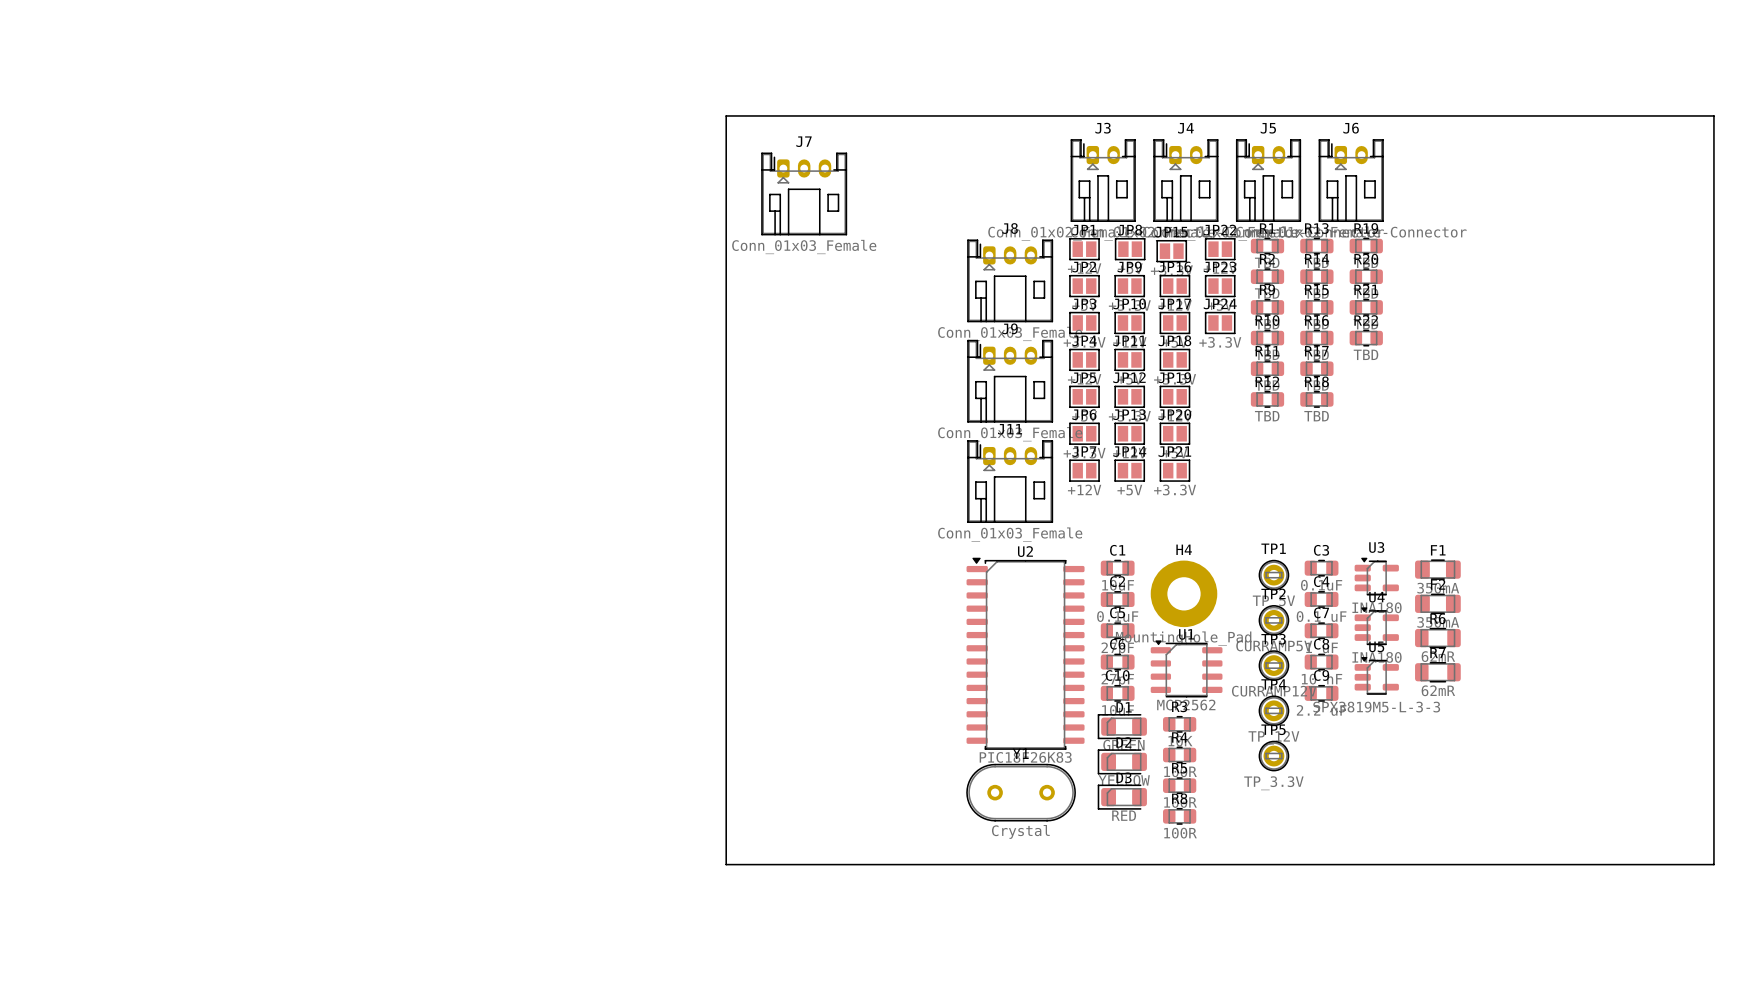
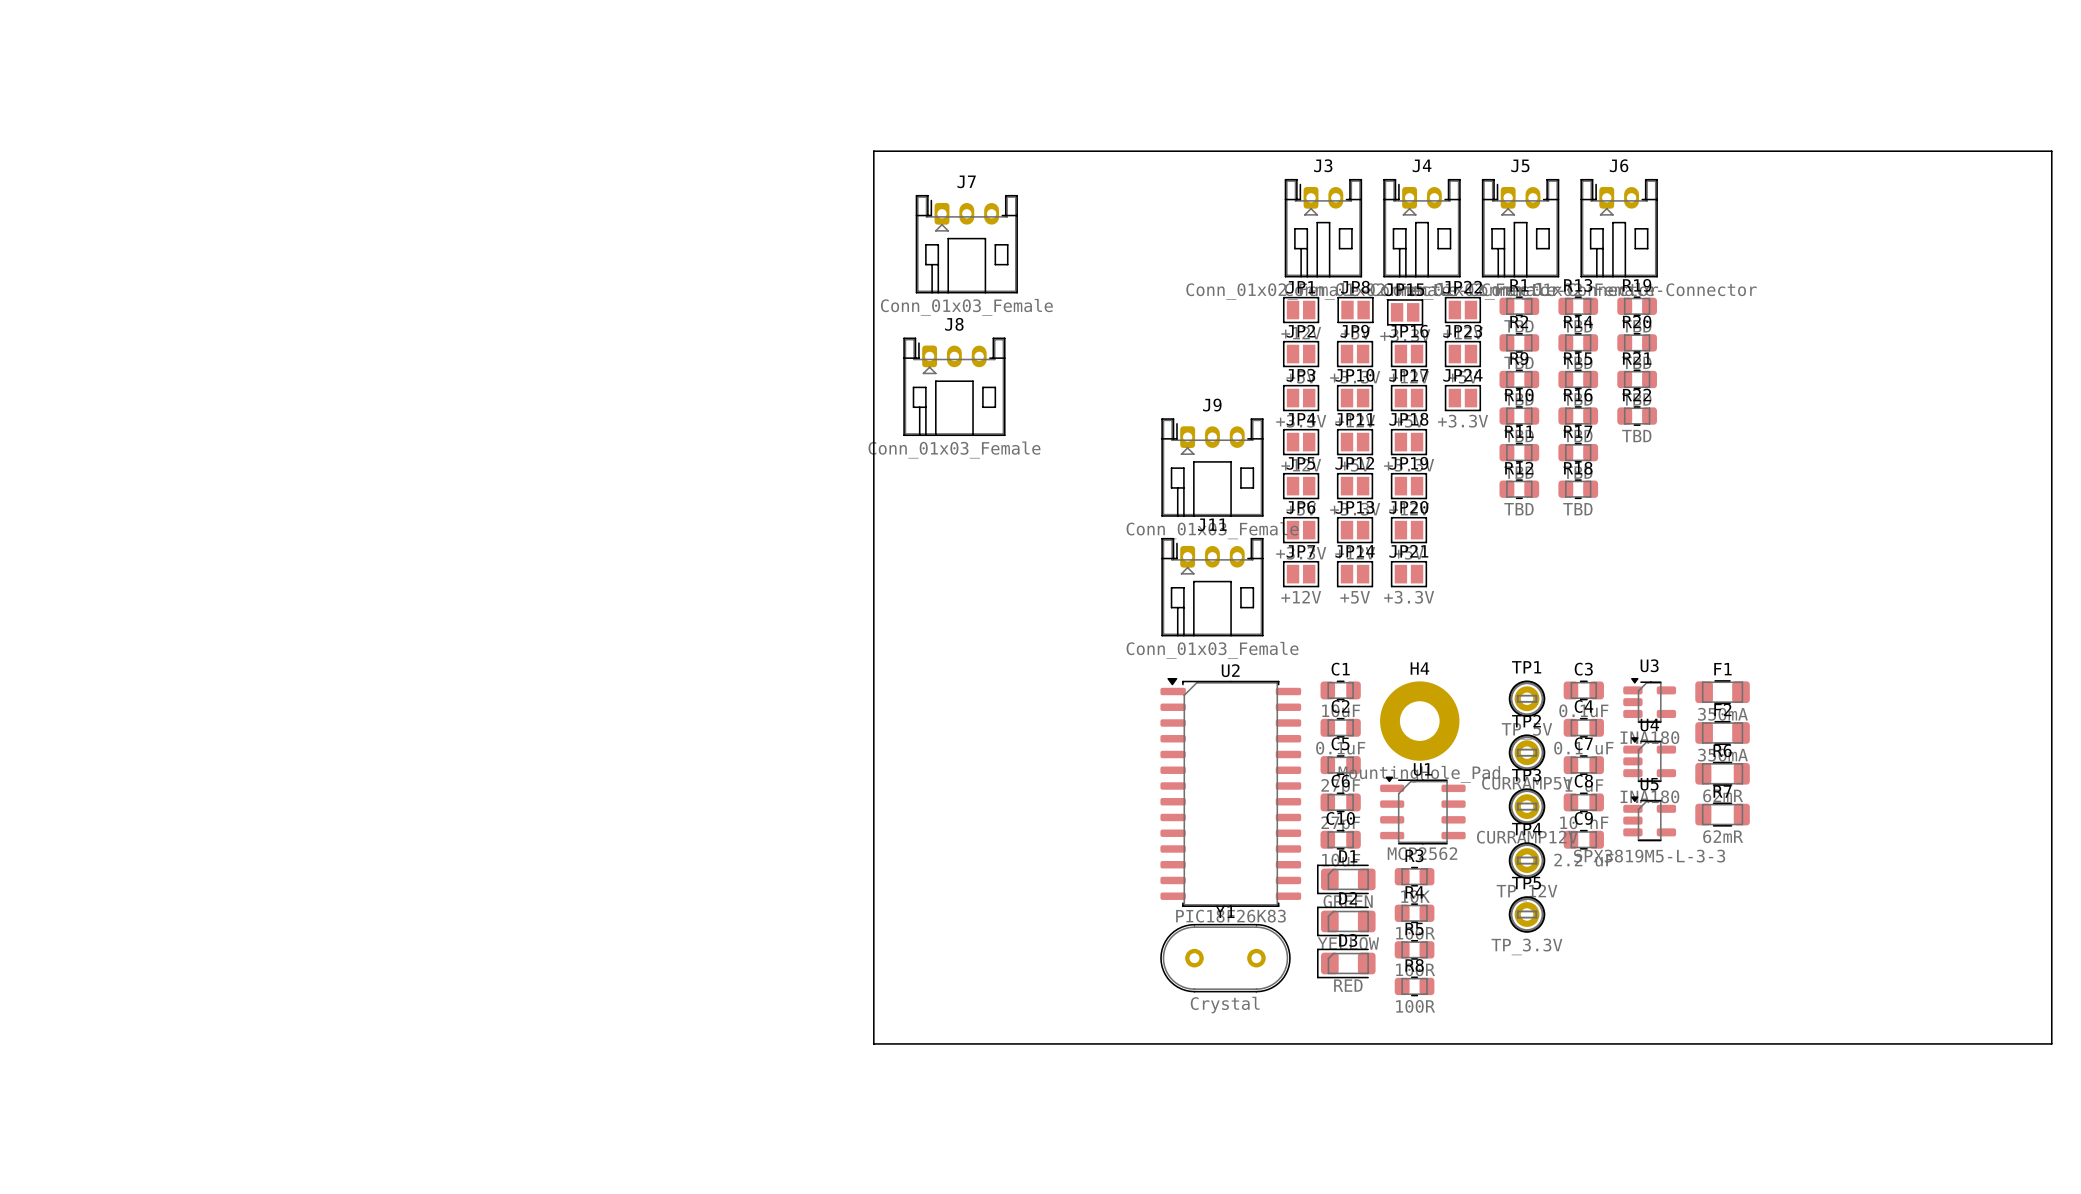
J8 position: (1010, 280) -> (954, 386)

